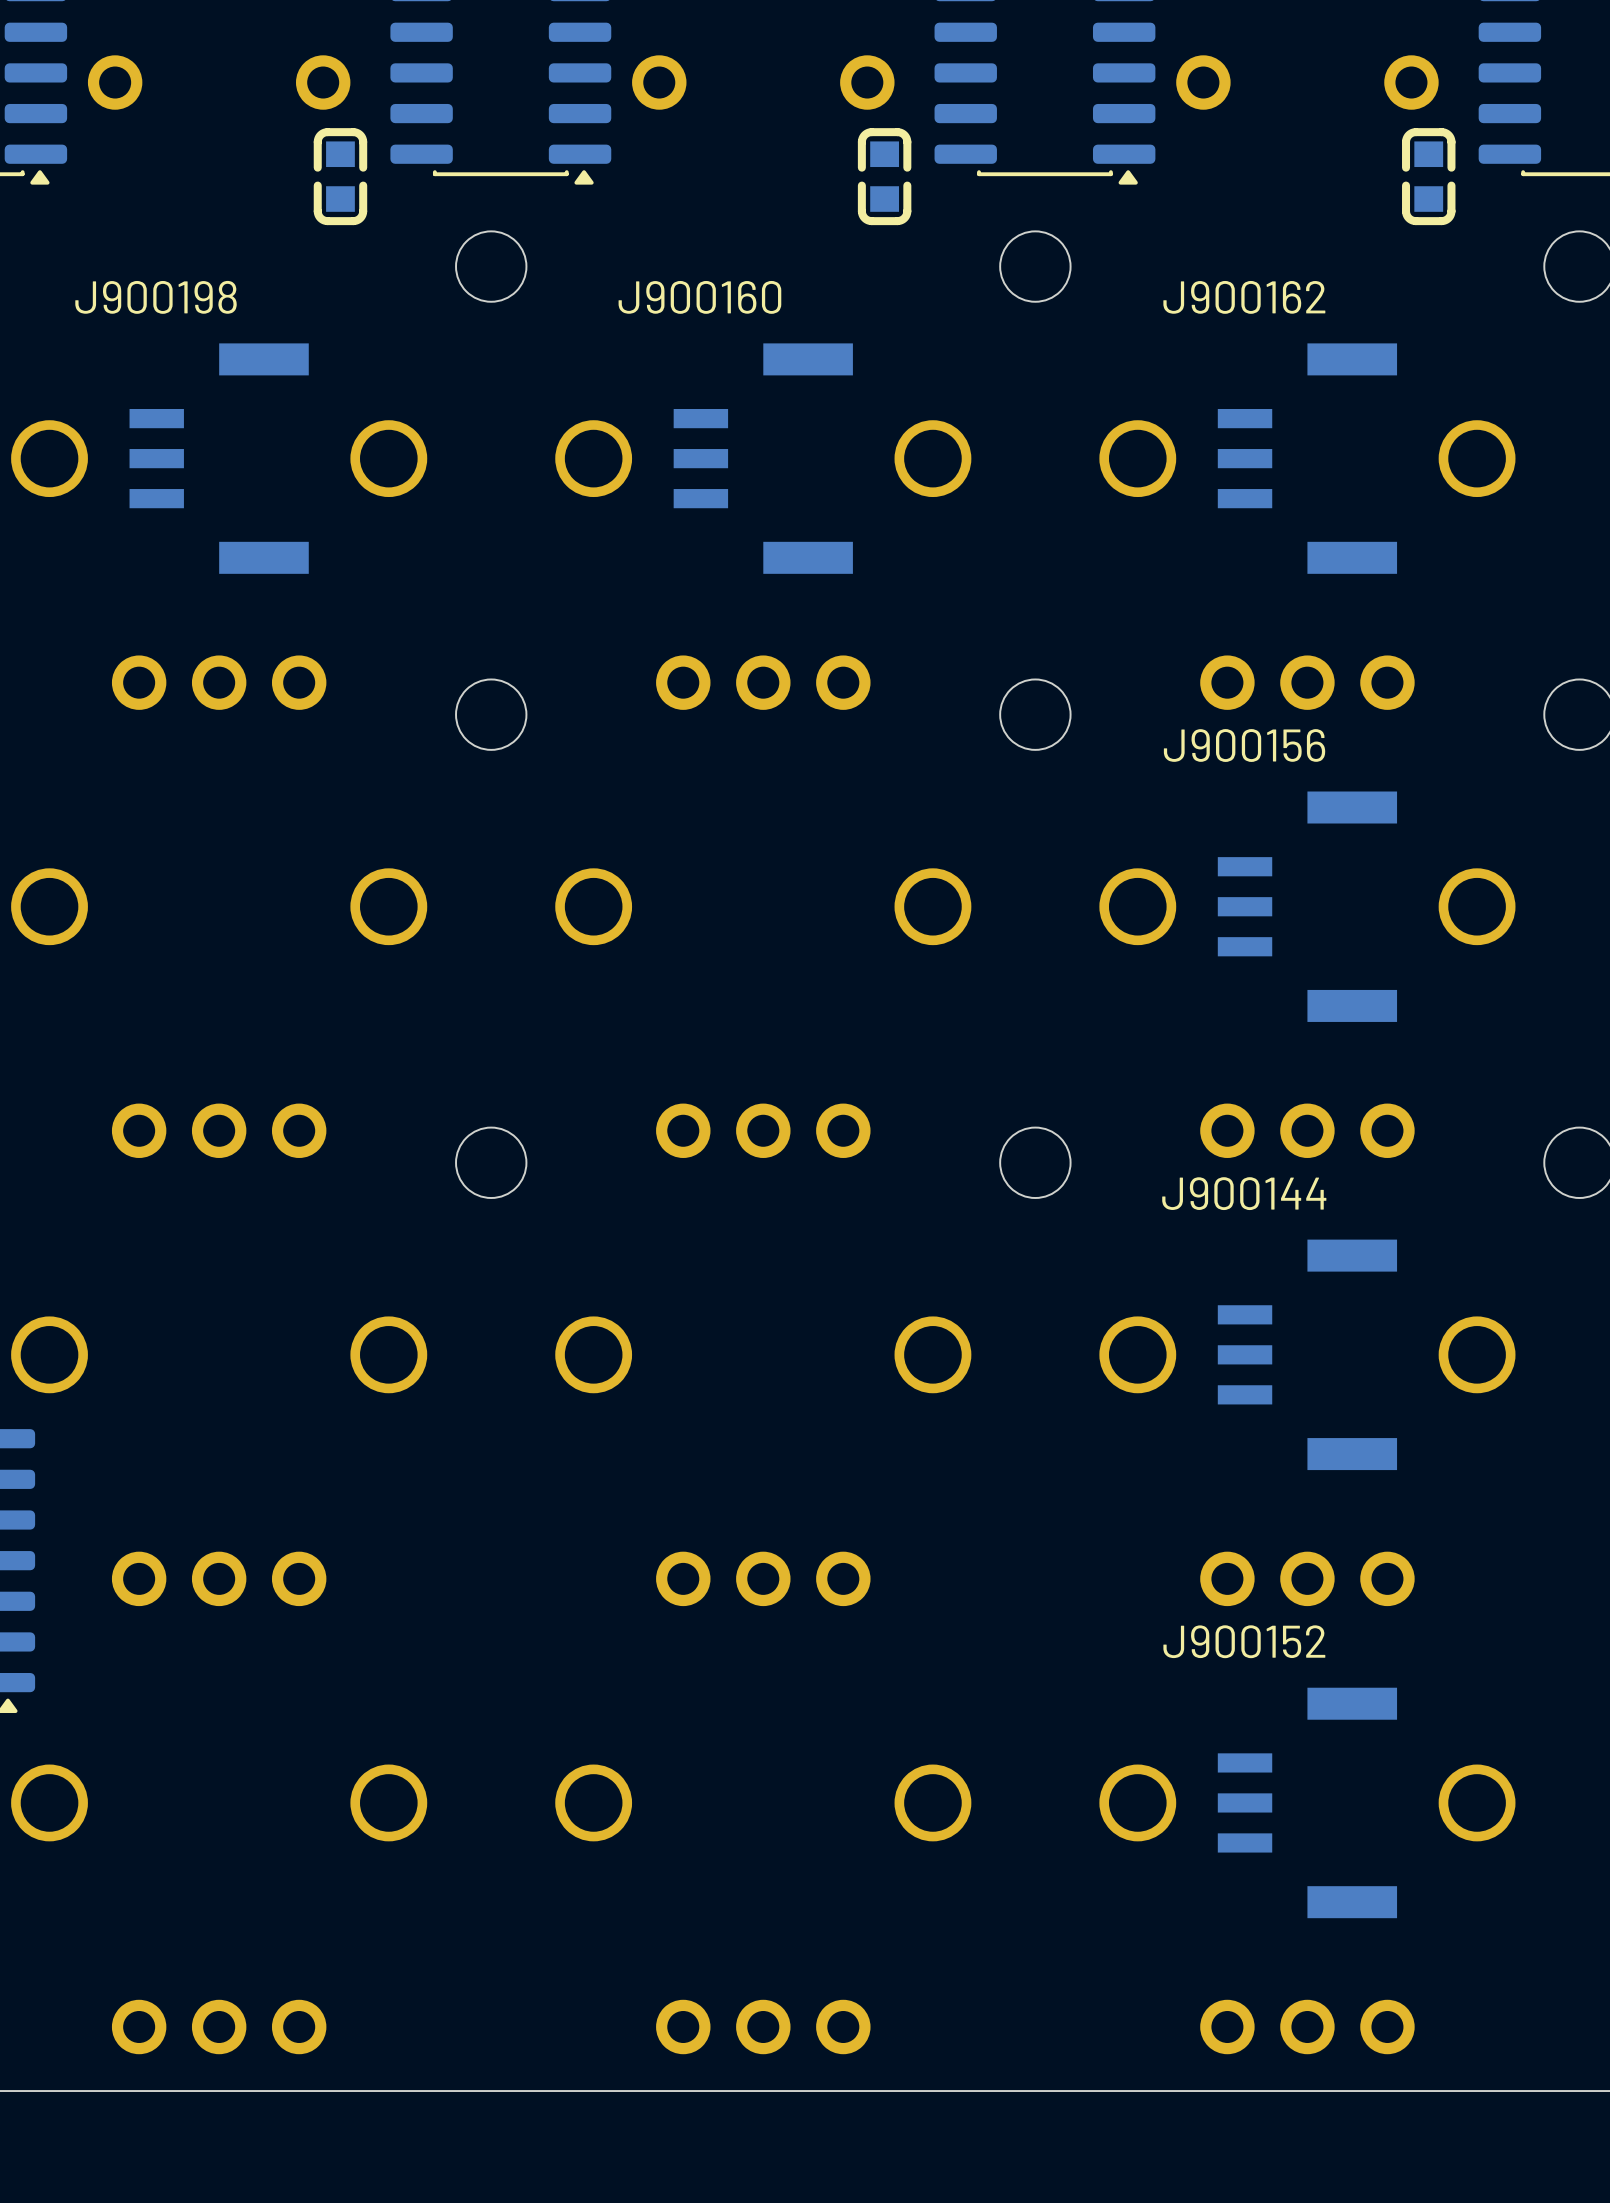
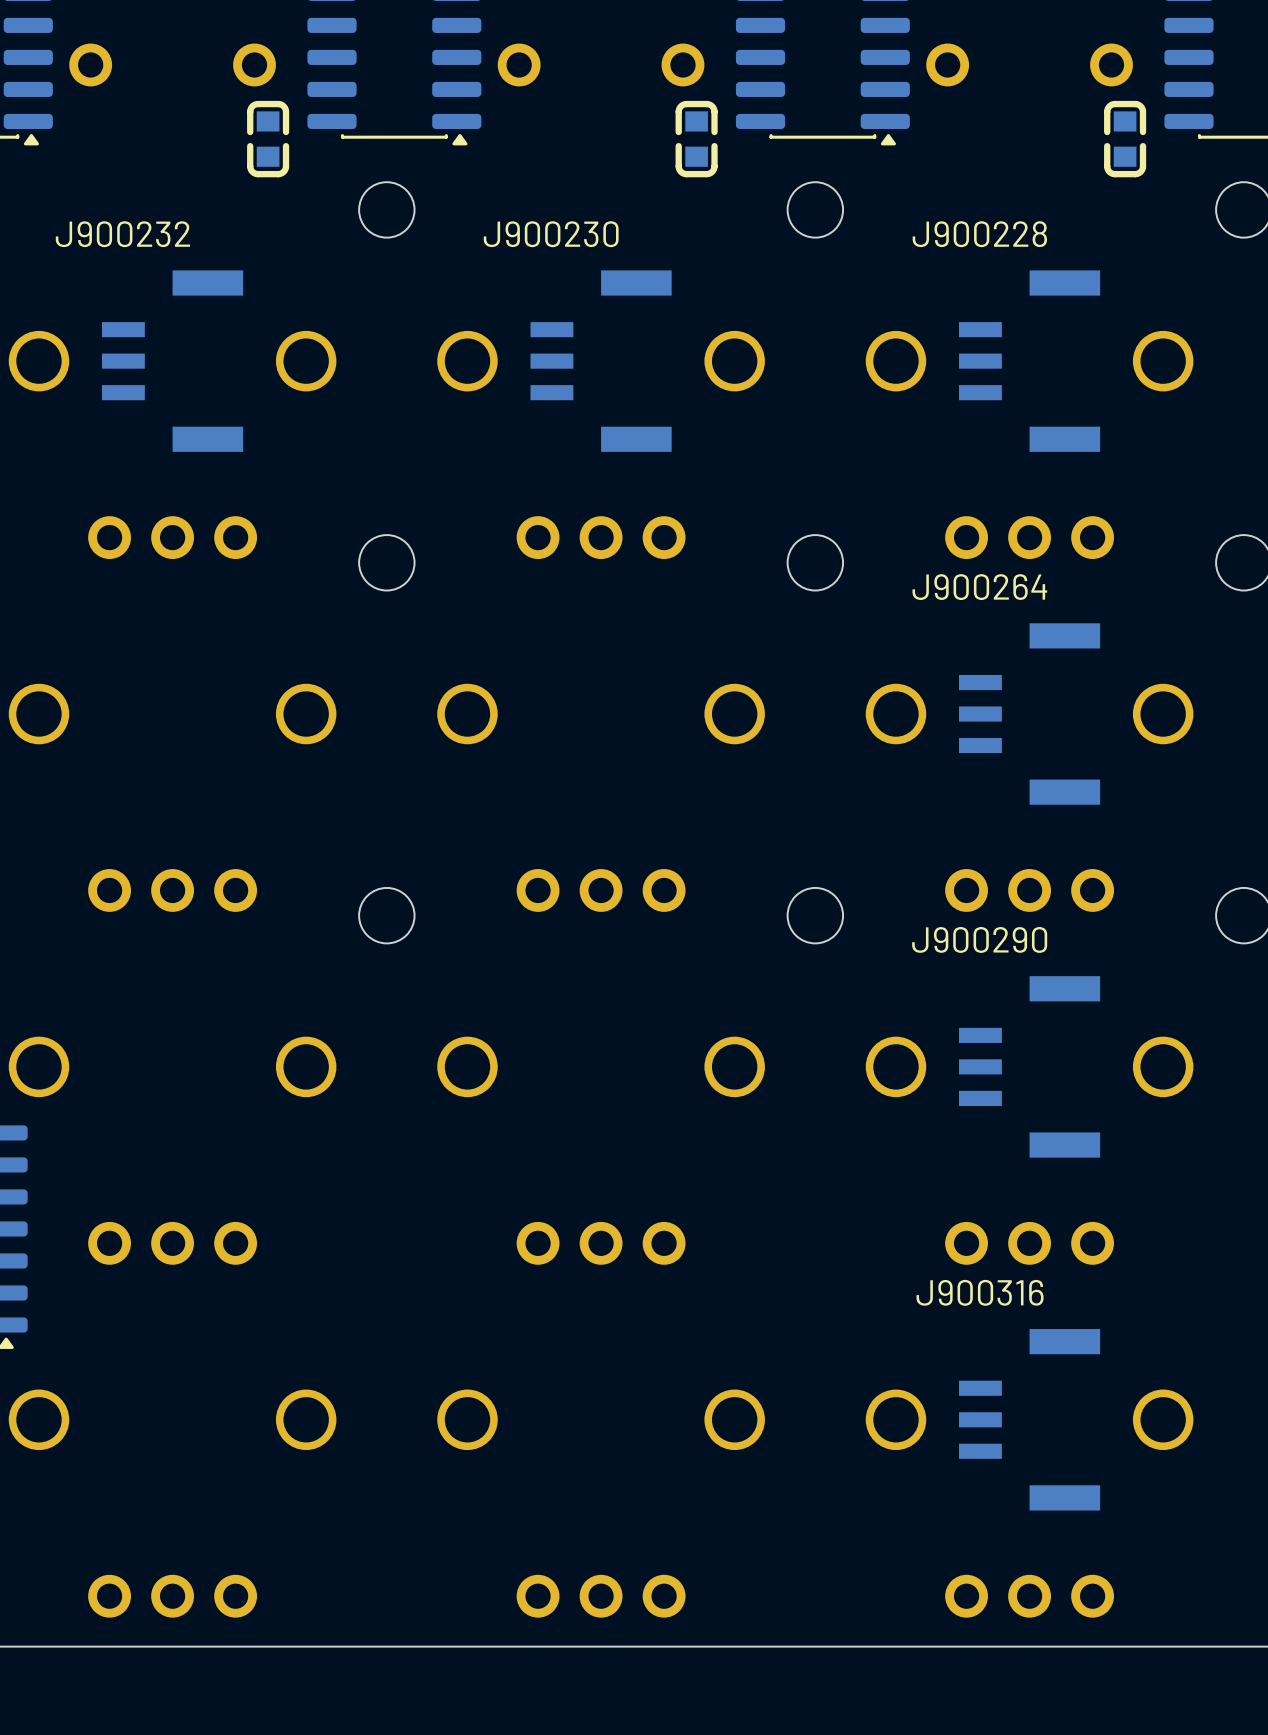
J900198 name: J900198 (156, 297) -> J900232 (122, 234)
J900160 name: J900160 (699, 297) -> J900230 (551, 234)
J900162 name: J900162 (1244, 297) -> J900228 (979, 234)
J900156 name: J900156 (1244, 745) -> J900264 (979, 587)
J900144 name: J900144 (1244, 1193) -> J900290 (979, 939)
J900152 name: J900152 (1244, 1641) -> J900316 (980, 1292)

